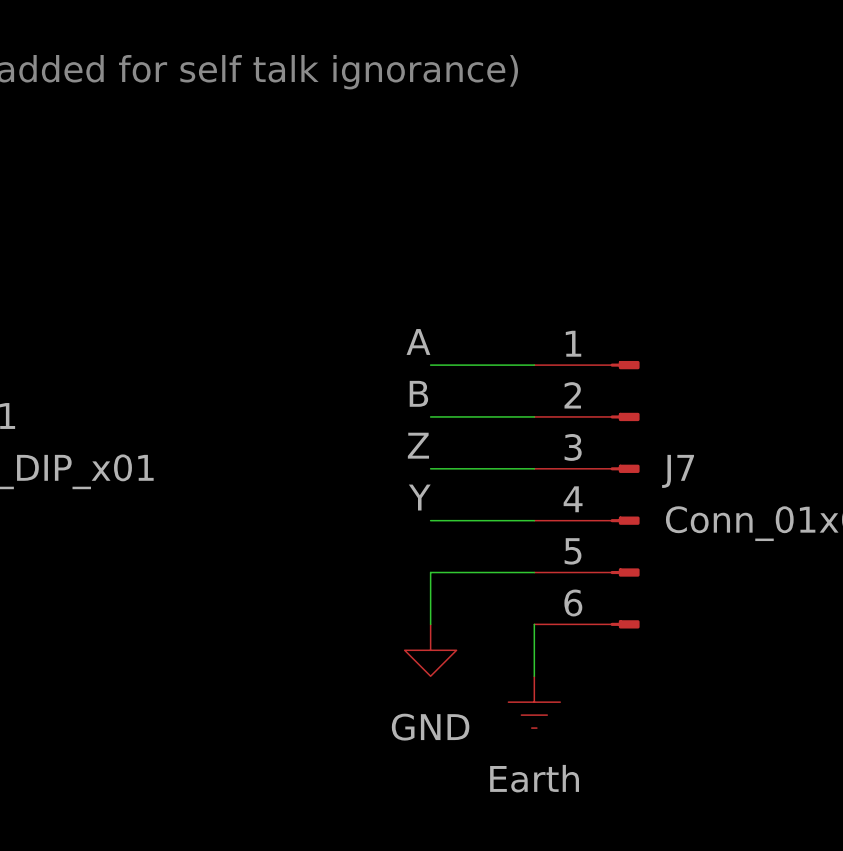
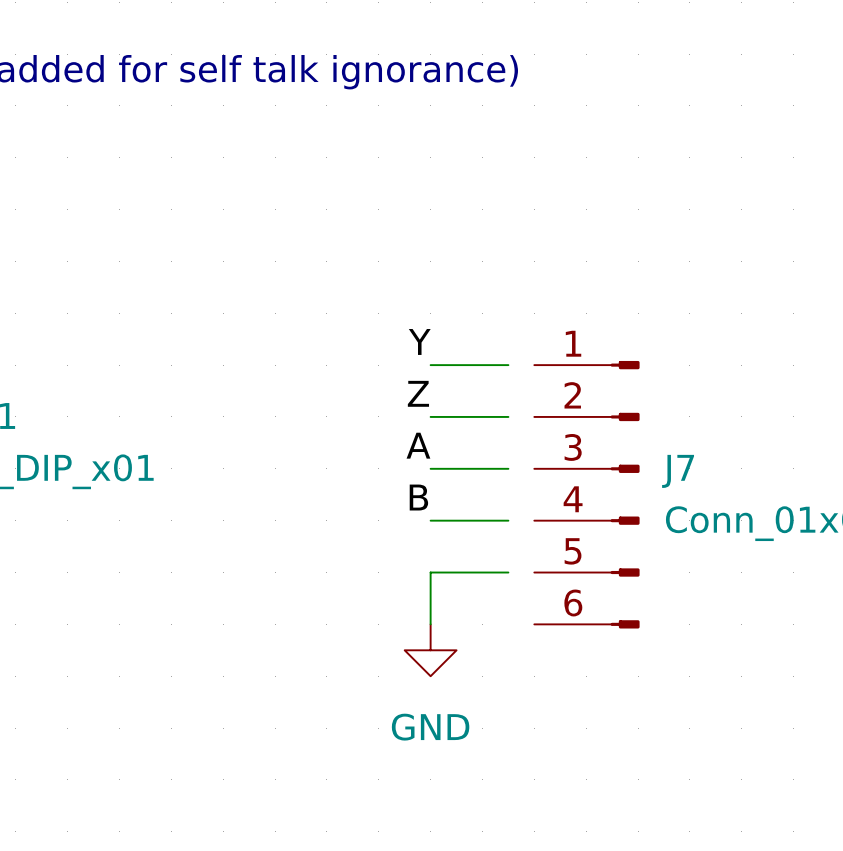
label: A (418, 341) -> Y (419, 341)
wire: (508, 365) (534, 365) -> none
label: B (418, 393) -> Z (418, 393)
wire: (508, 416) (534, 416) -> none
label: Z (418, 445) -> A (418, 445)
wire: (508, 468) (534, 468) -> none
label: Y (419, 497) -> B (418, 497)
wire: (508, 520) (534, 520) -> none
wire: (508, 572) (534, 572) -> none
wire: (534, 624) (534, 676) -> none
power symbol: Earth (534, 702) -> none

